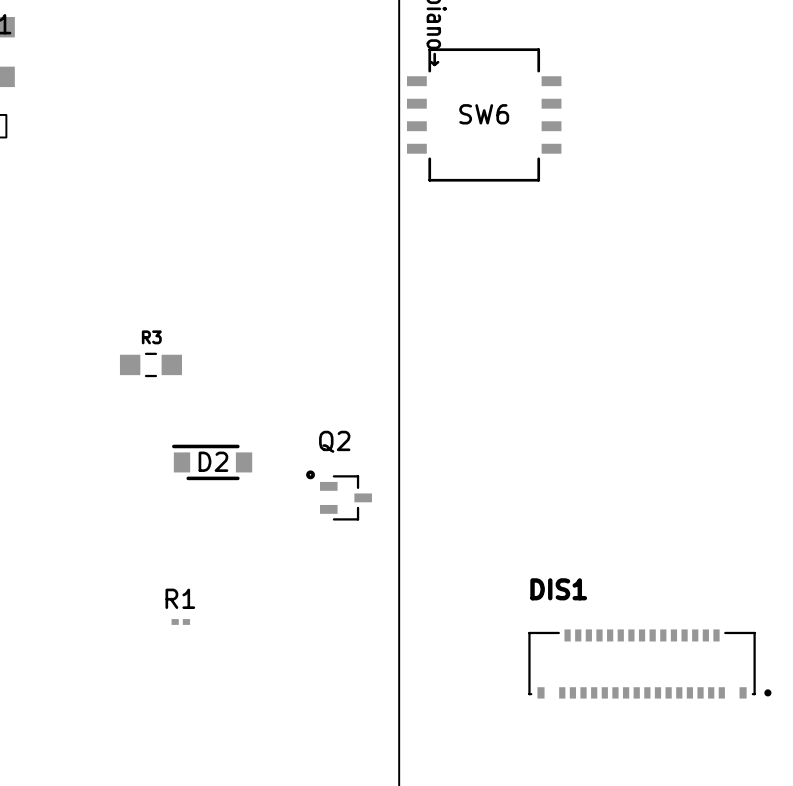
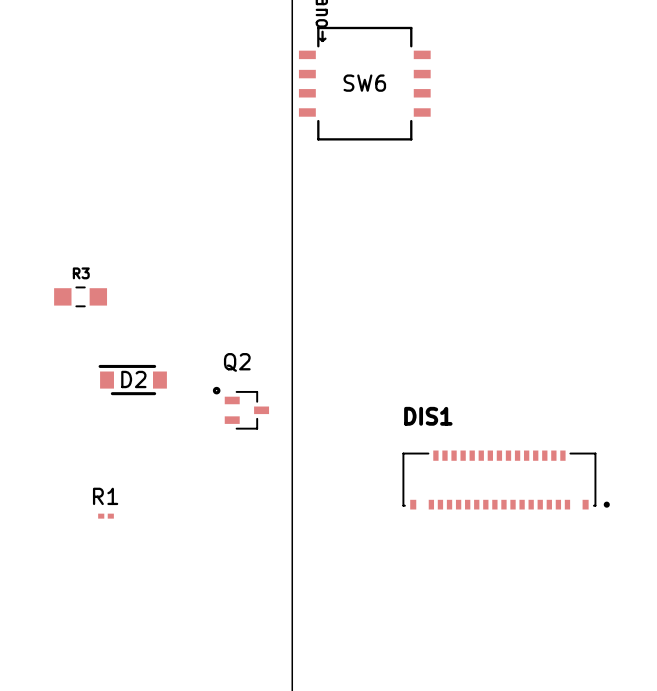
DIS1 position: (649, 663) -> (506, 480)

